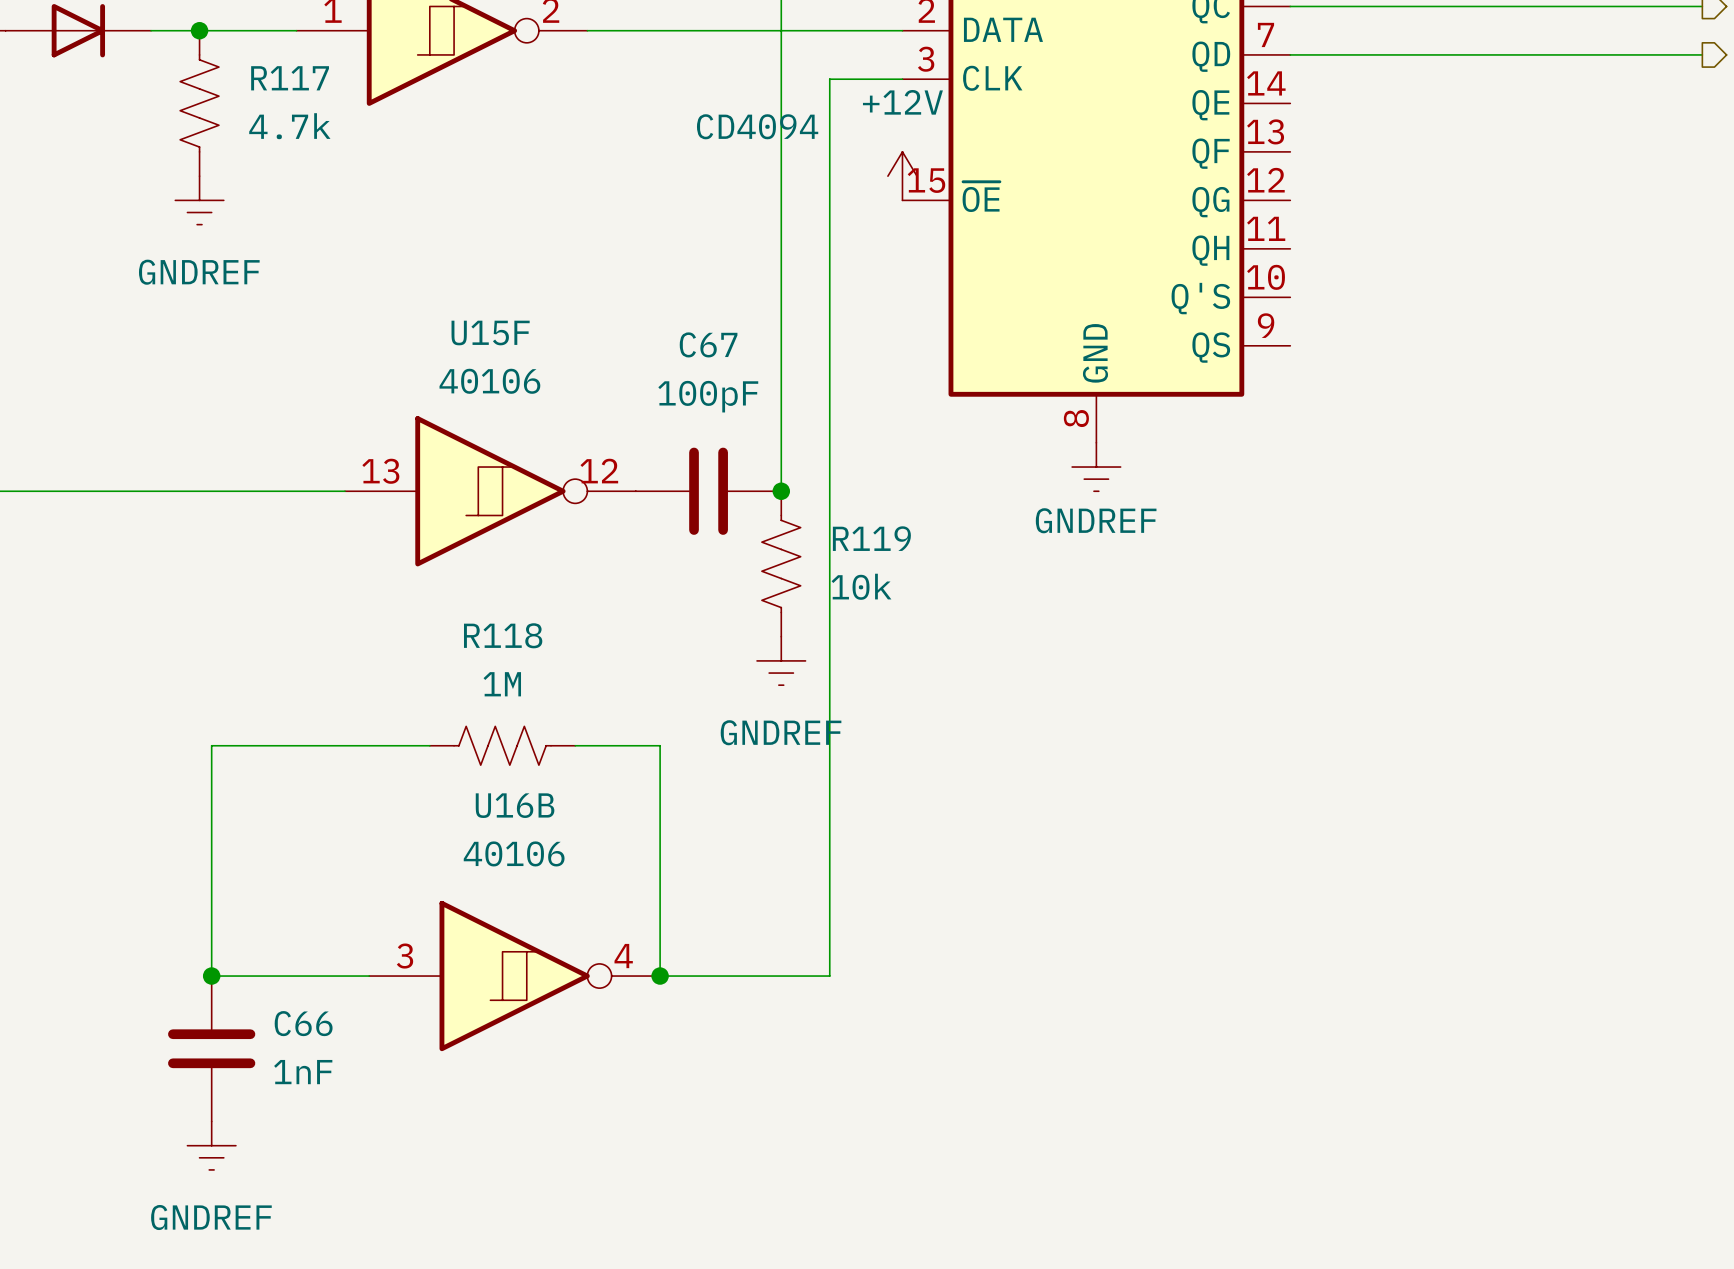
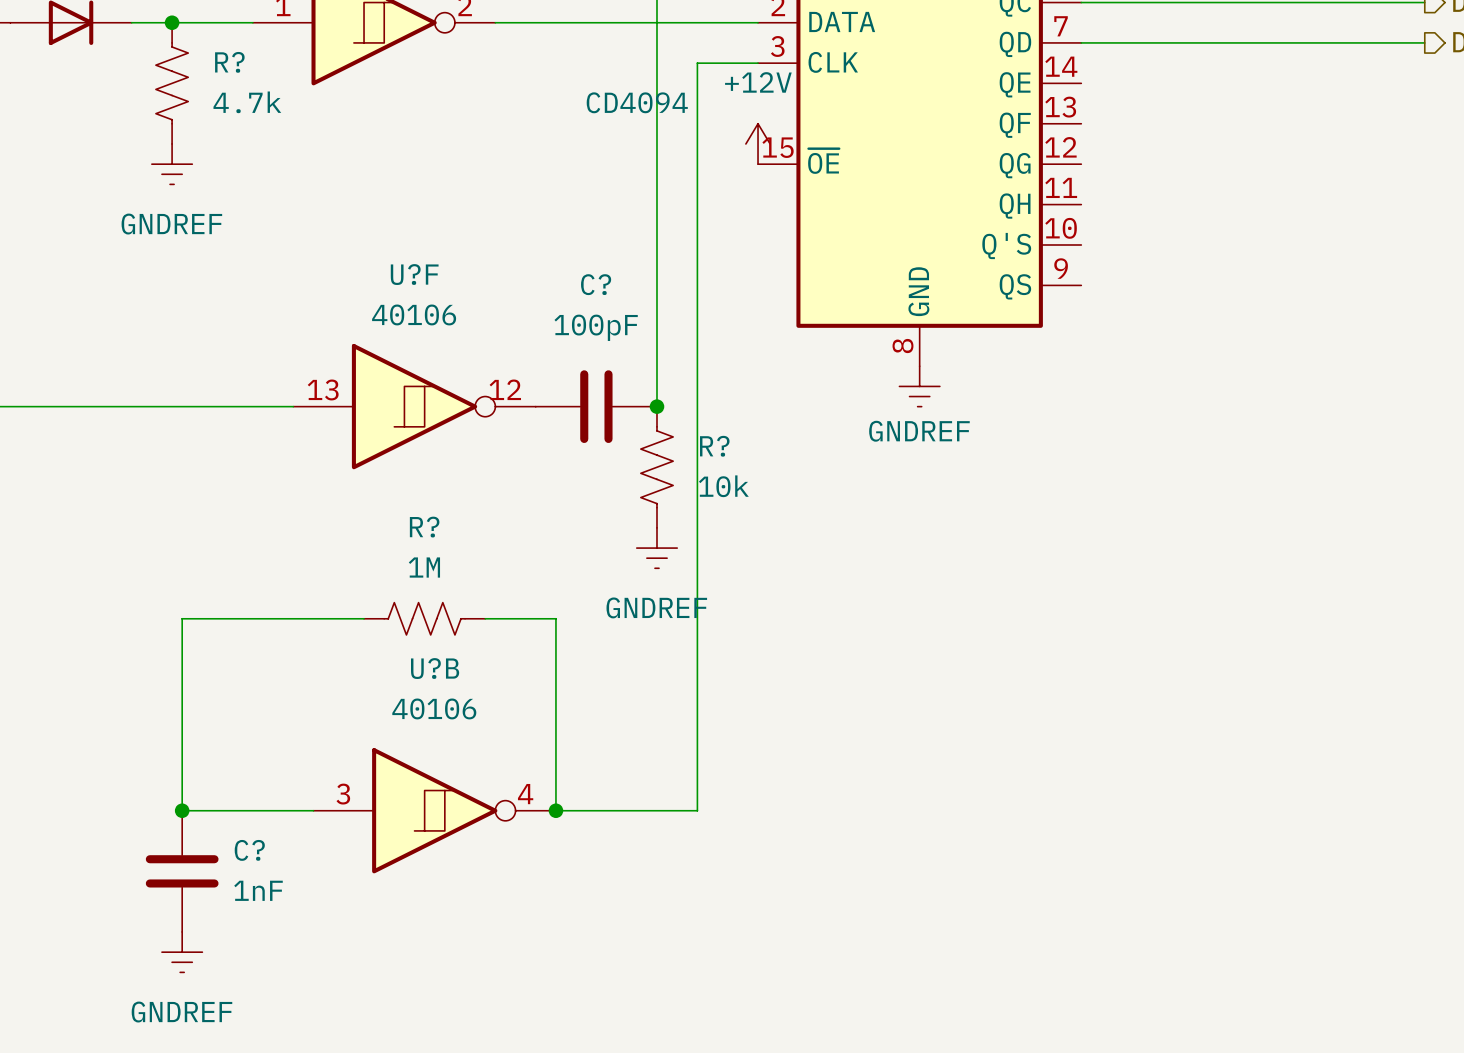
R117 name: R117 (290, 78) -> R? (229, 62)
U15F name: U15F (490, 333) -> U?F (414, 274)
C67 name: C67 (708, 344) -> C? (596, 284)
R119 name: R119 (871, 538) -> R? (714, 446)
R118 name: R118 (503, 635) -> R? (424, 527)
U16B name: U16B (515, 805) -> U?B (435, 668)
C66 name: C66 (303, 1023) -> C? (249, 850)

